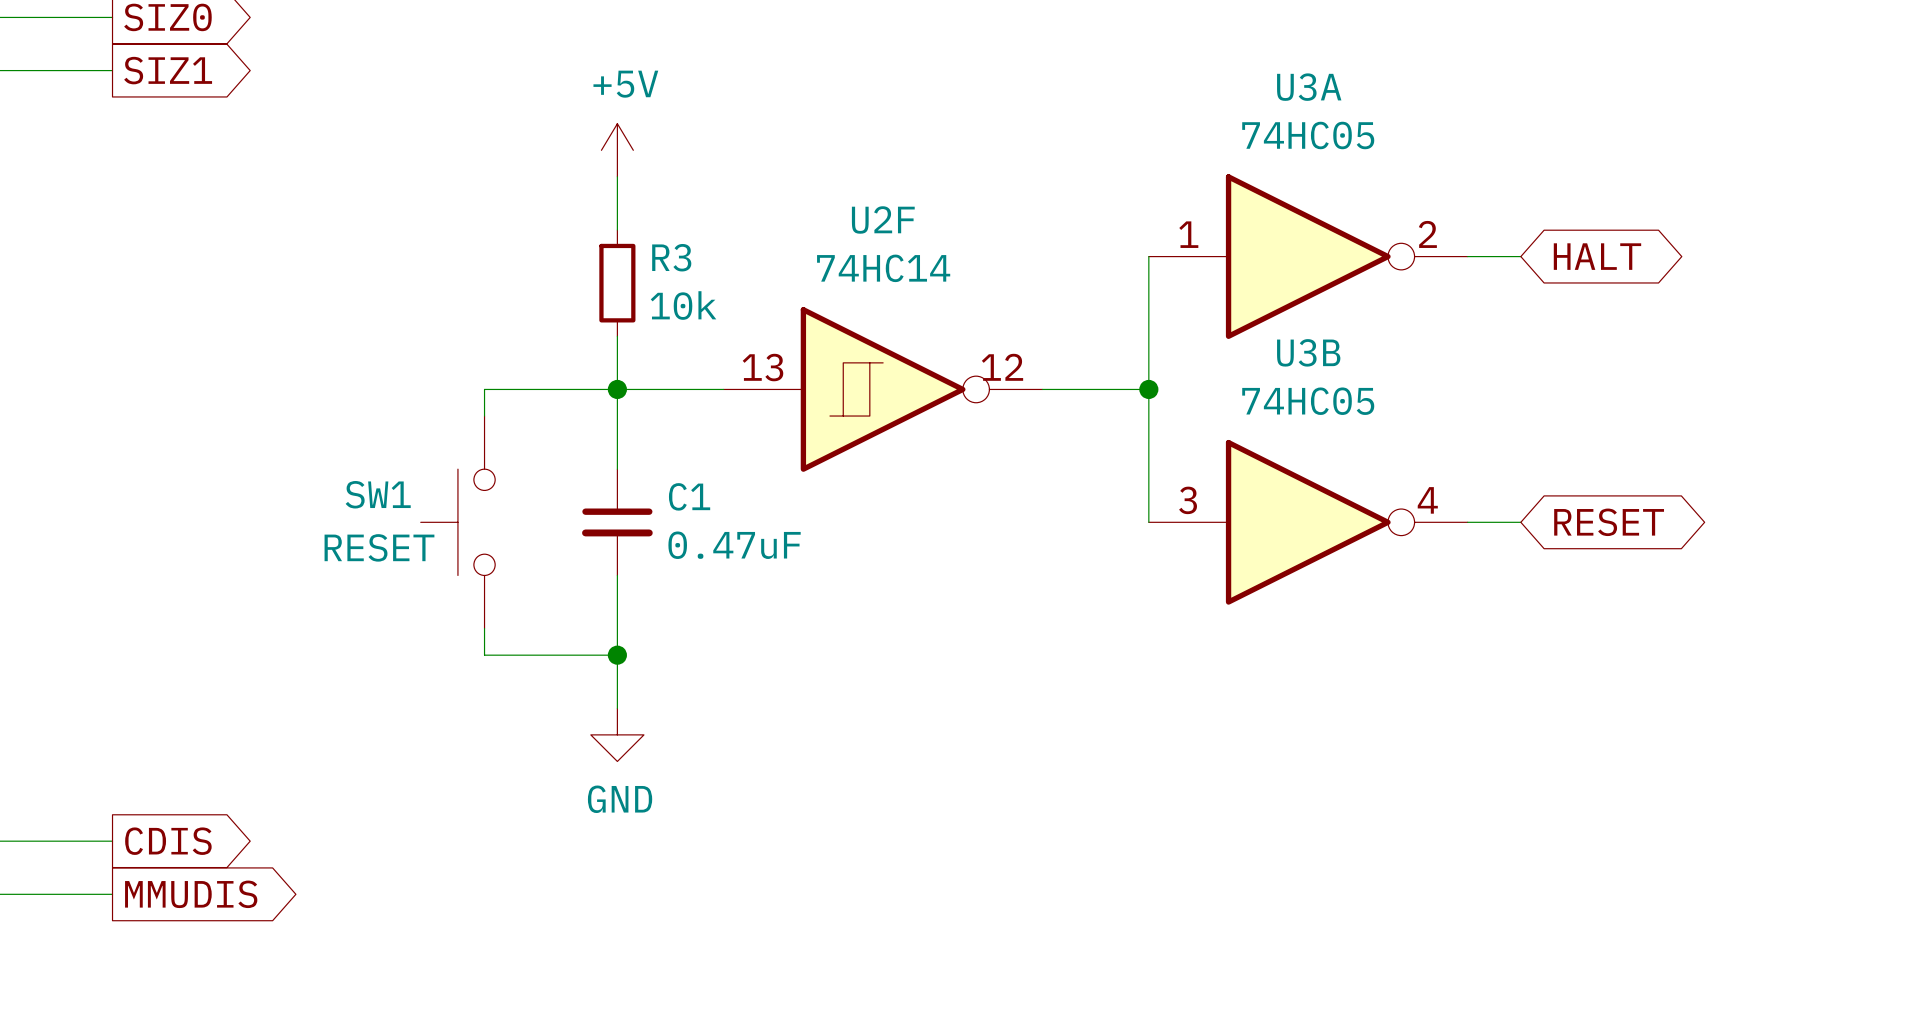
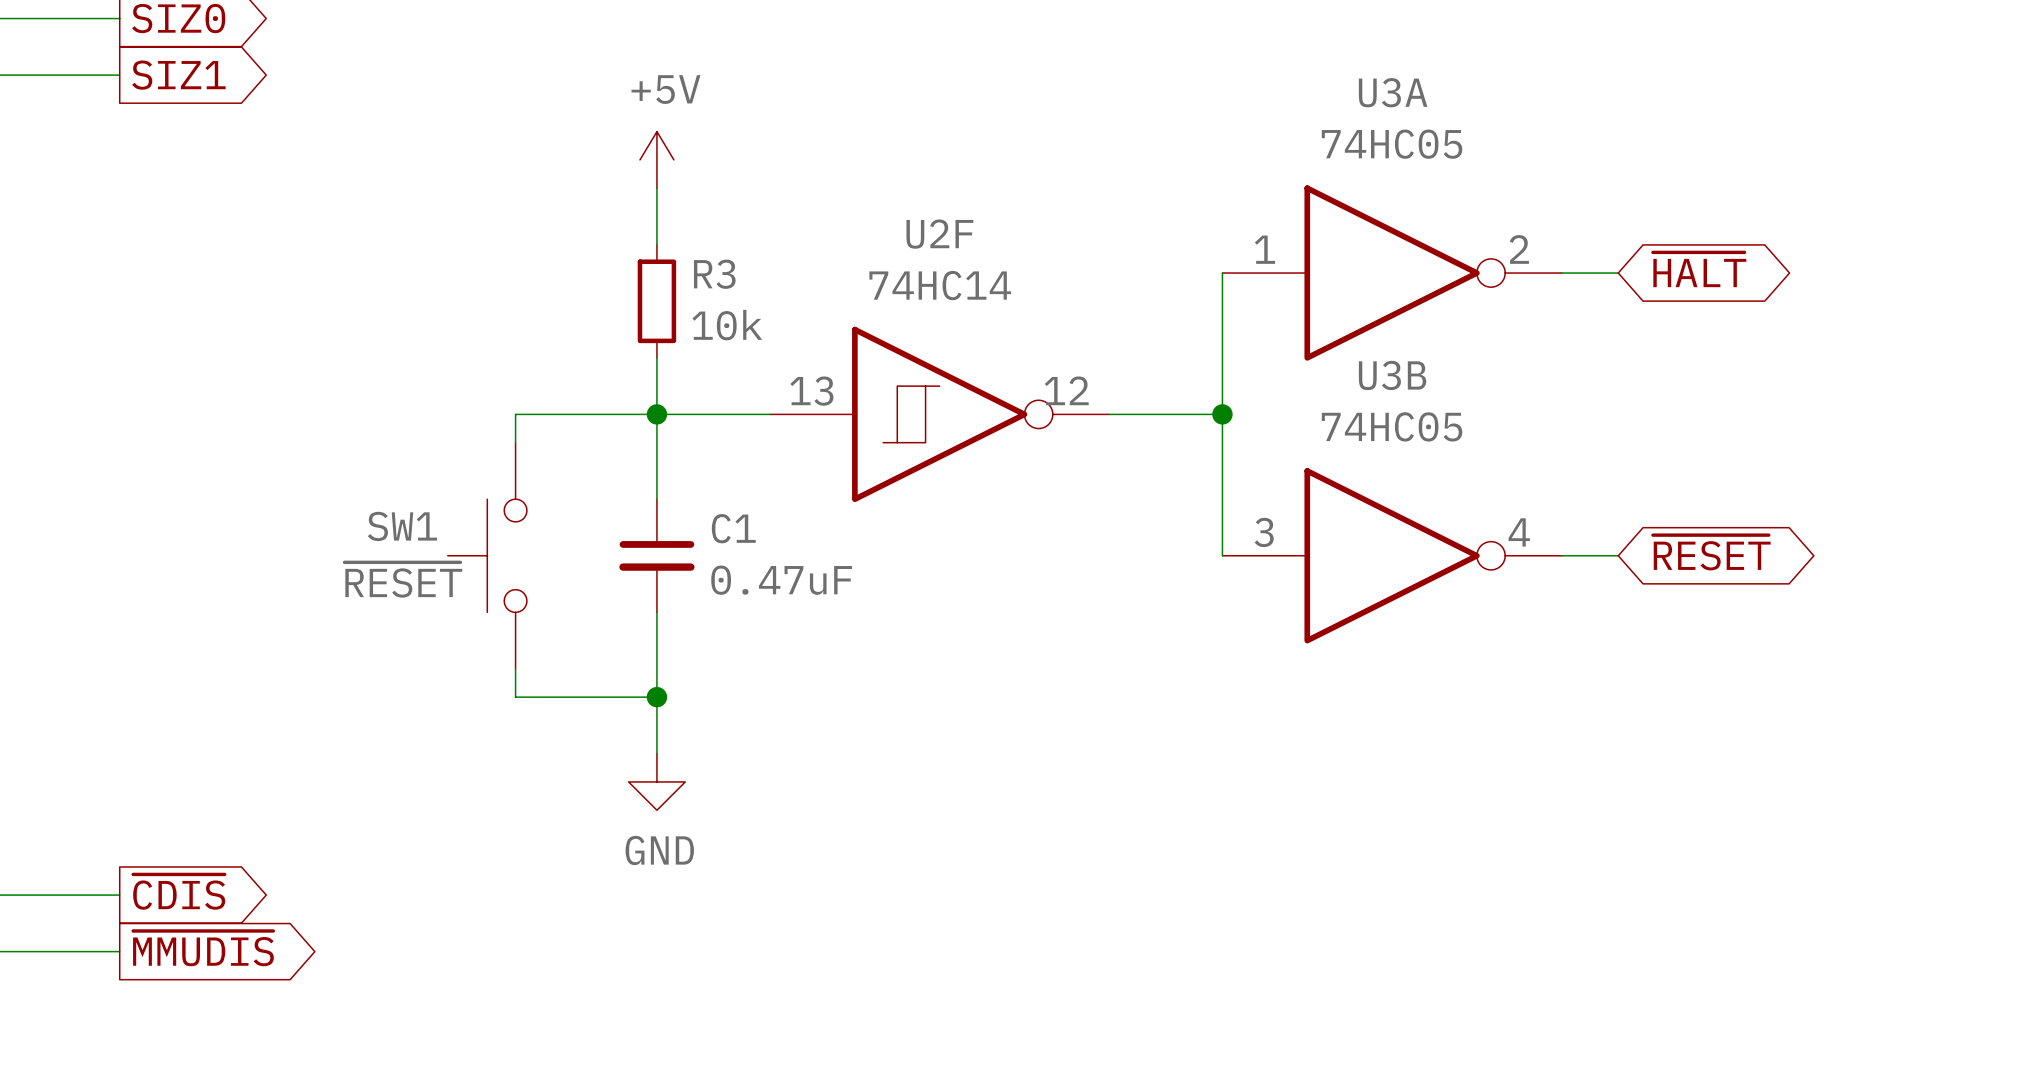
global label: HALT (1597, 256) -> ~{HALT} (1699, 269)
global label: RESET (1609, 522) -> ~{RESET} (1711, 552)
SW1 value: RESET (379, 547) -> ~{RESET} (403, 579)
global label: CDIS (168, 841) -> ~{CDIS} (179, 892)
global label: MMUDIS (191, 894) -> ~{MMUDIS} (203, 948)

